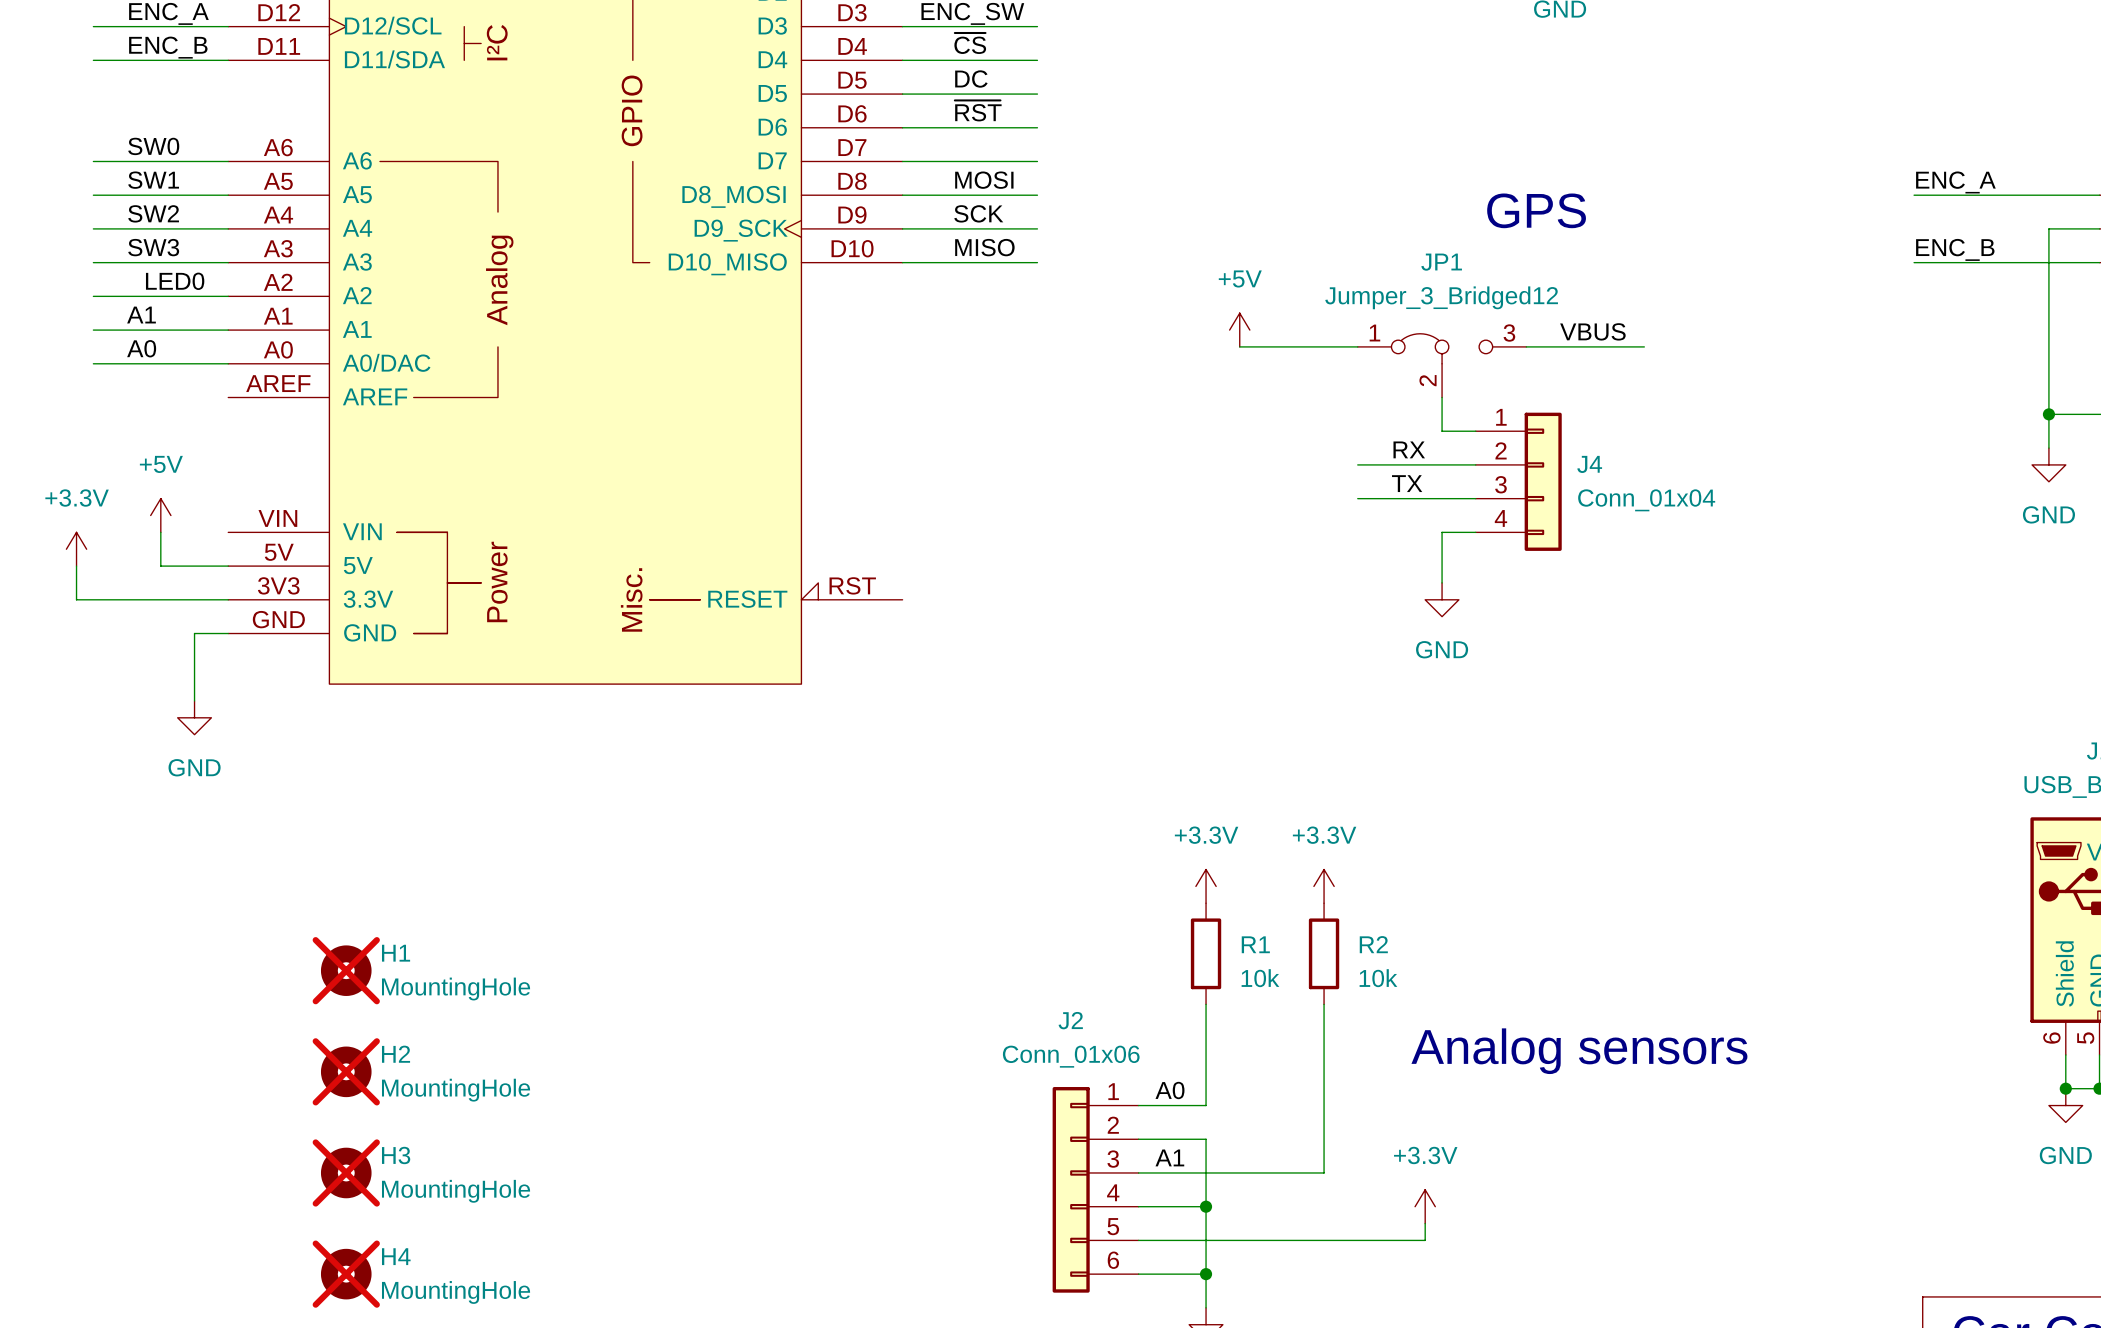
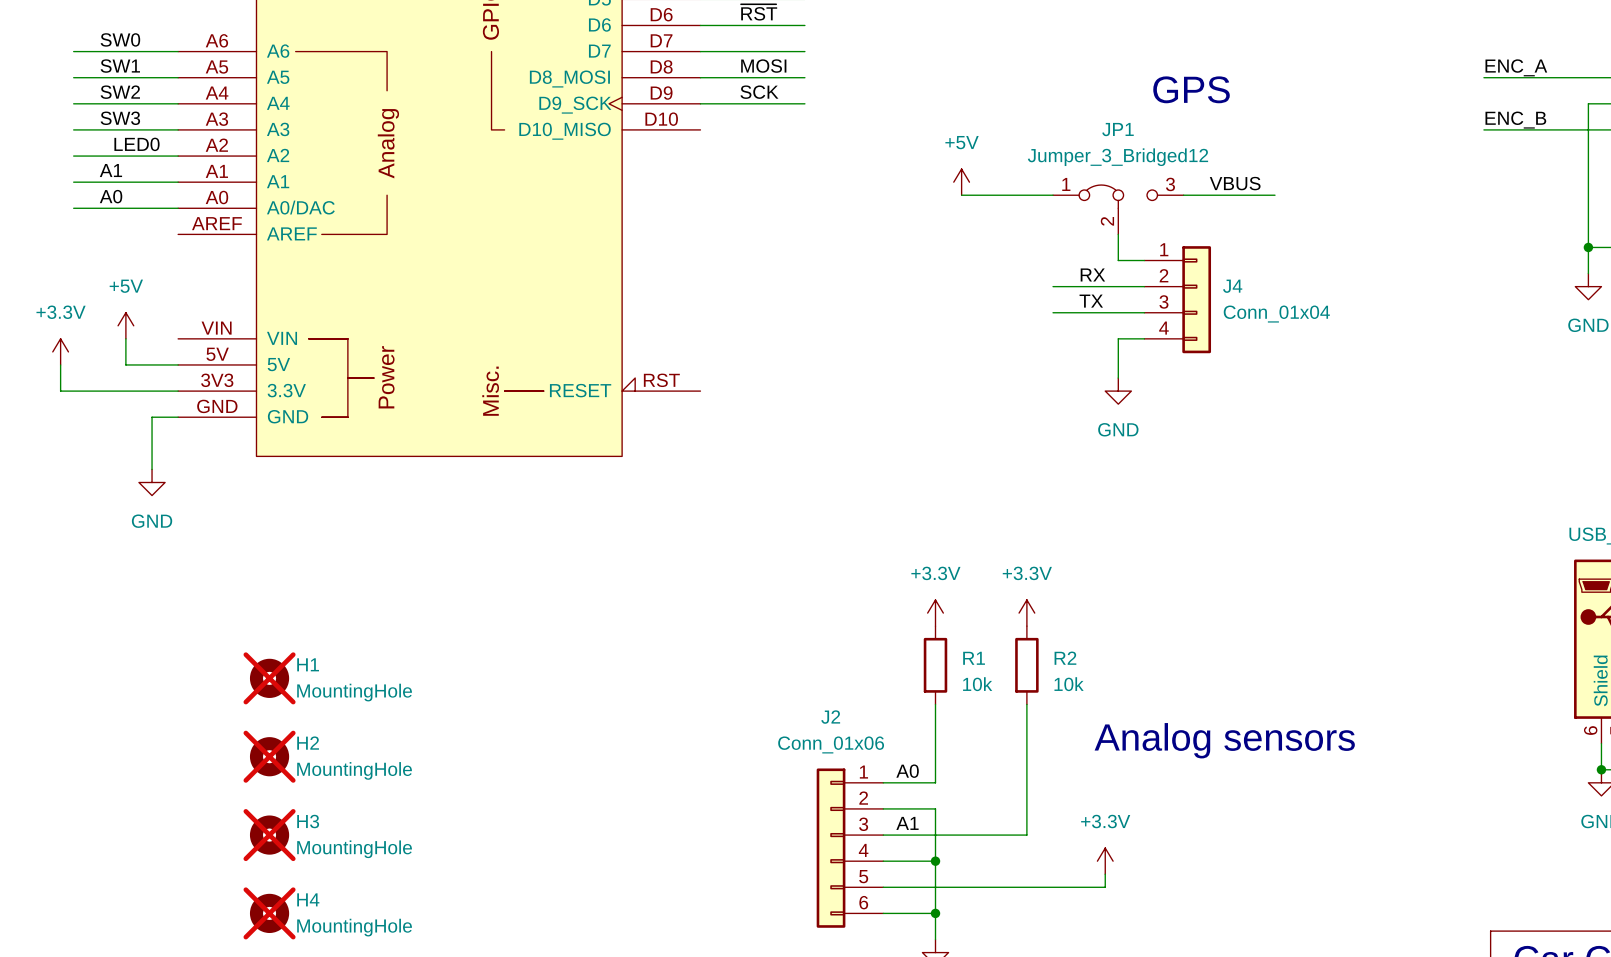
label: MISO (984, 247) -> none
wire: (902, 262) (1037, 262) -> none

